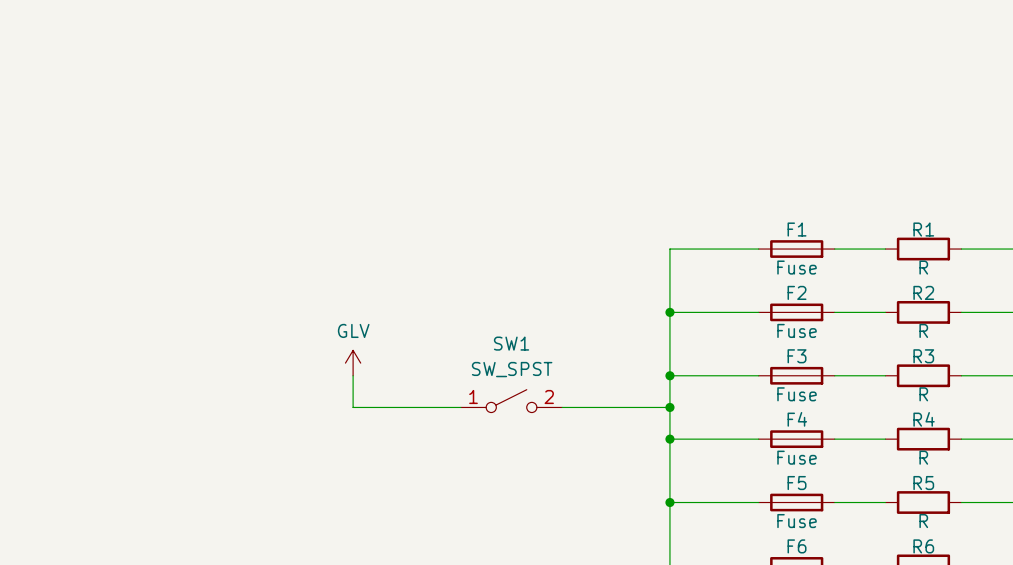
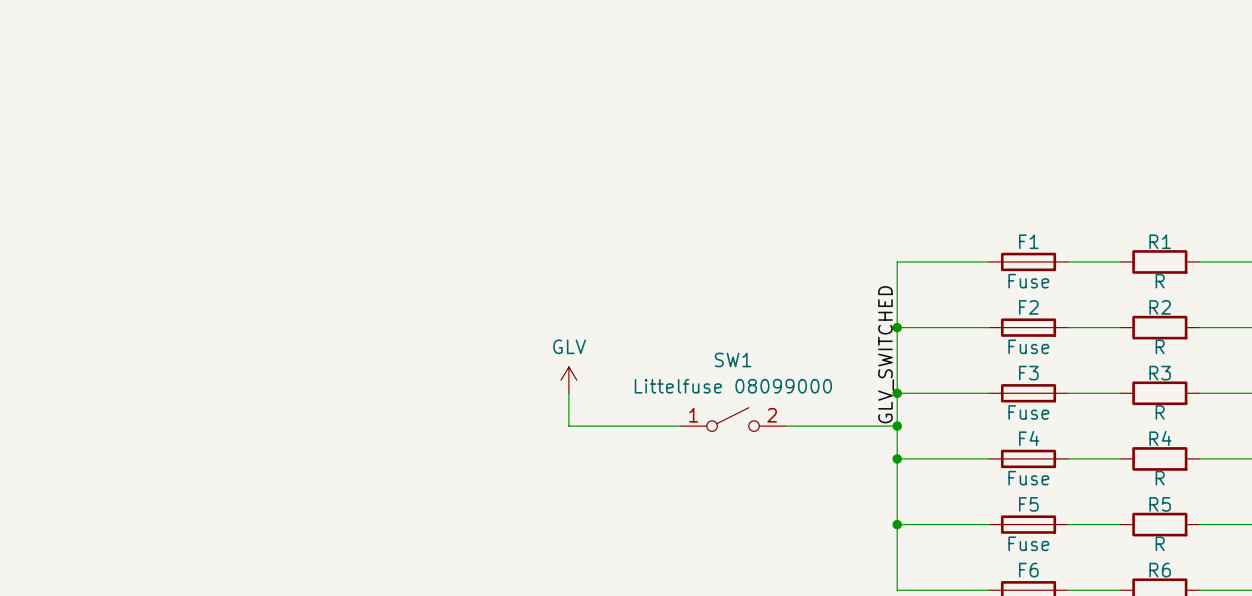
label: none -> GLV_SWITCHED (886, 354)
SW1 value: SW_SPST (512, 369) -> Littelfuse 08099000 (733, 386)

